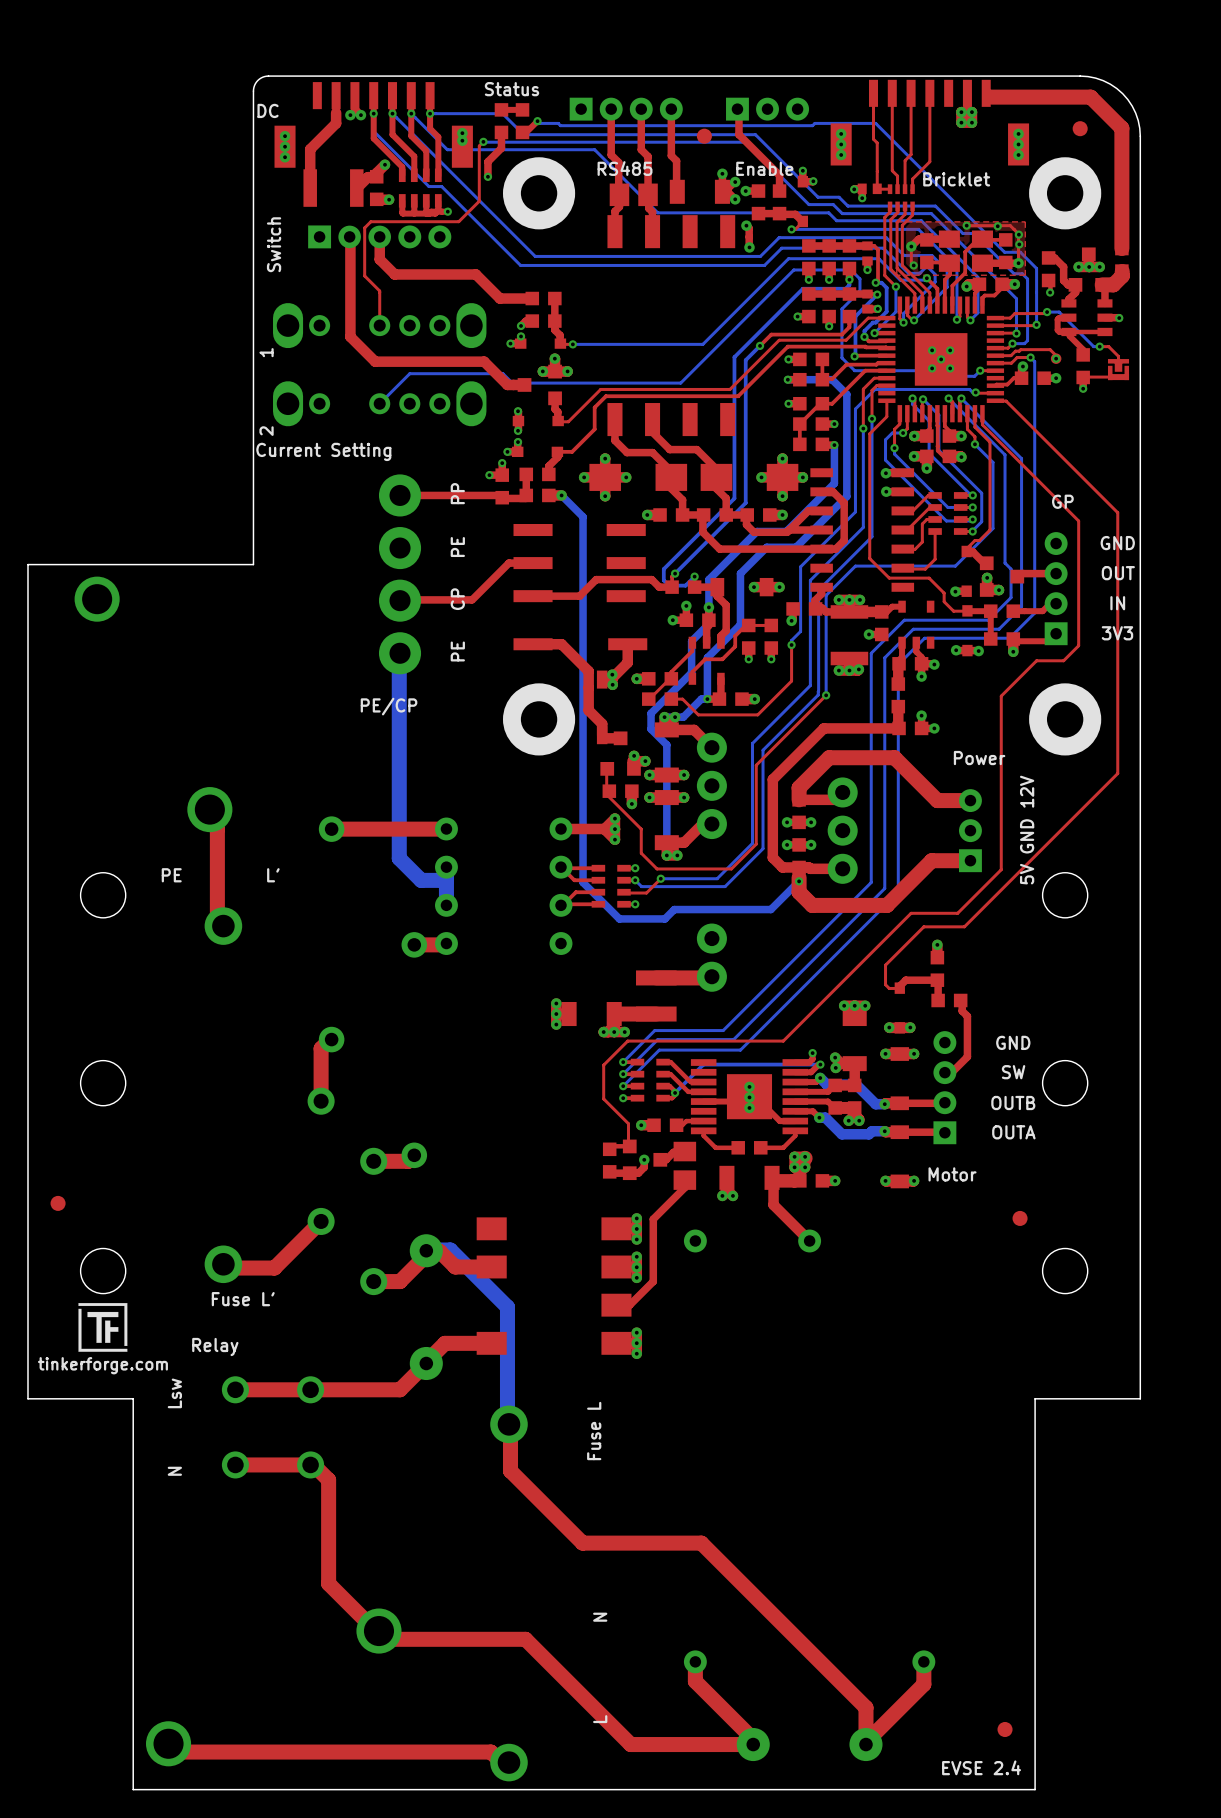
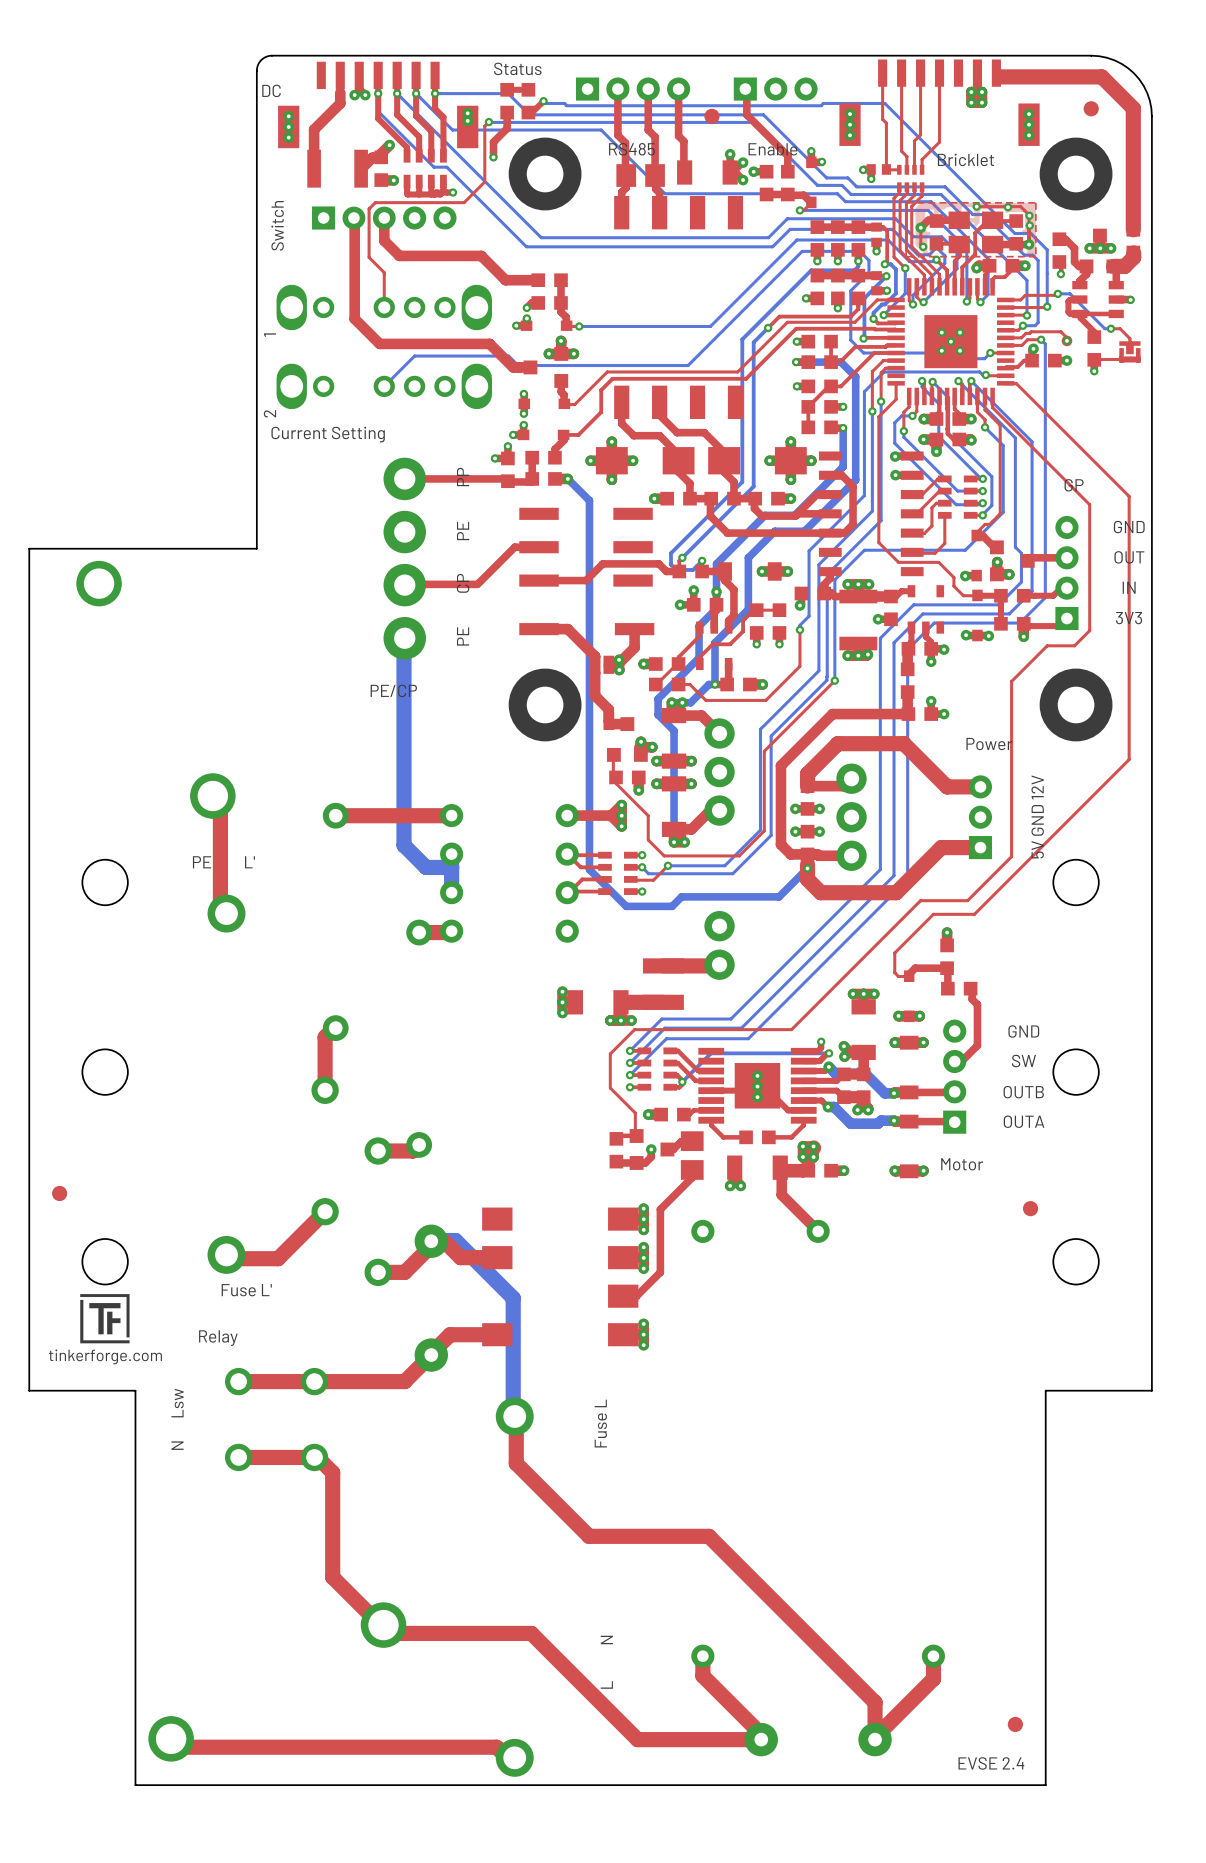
top track: (746, 225) (749, 228) (749, 247) -> none
via: (746, 225) -> none
via: (749, 247) -> none

